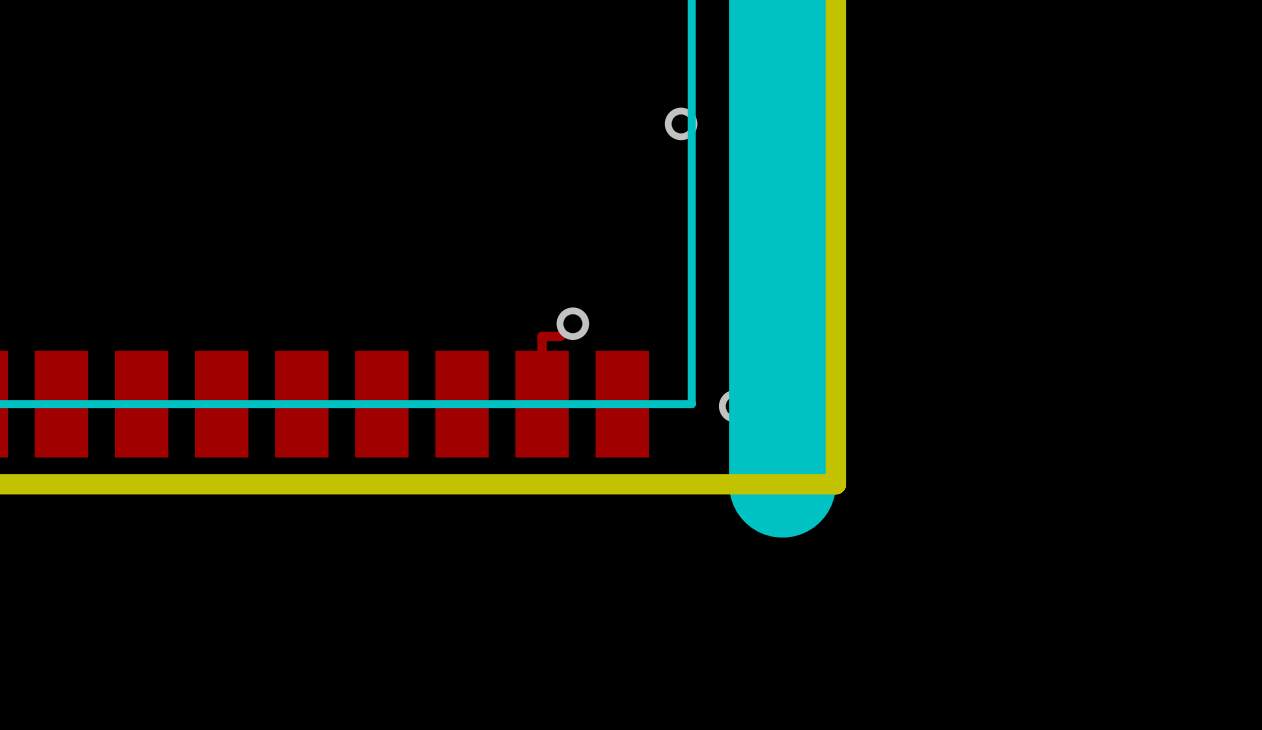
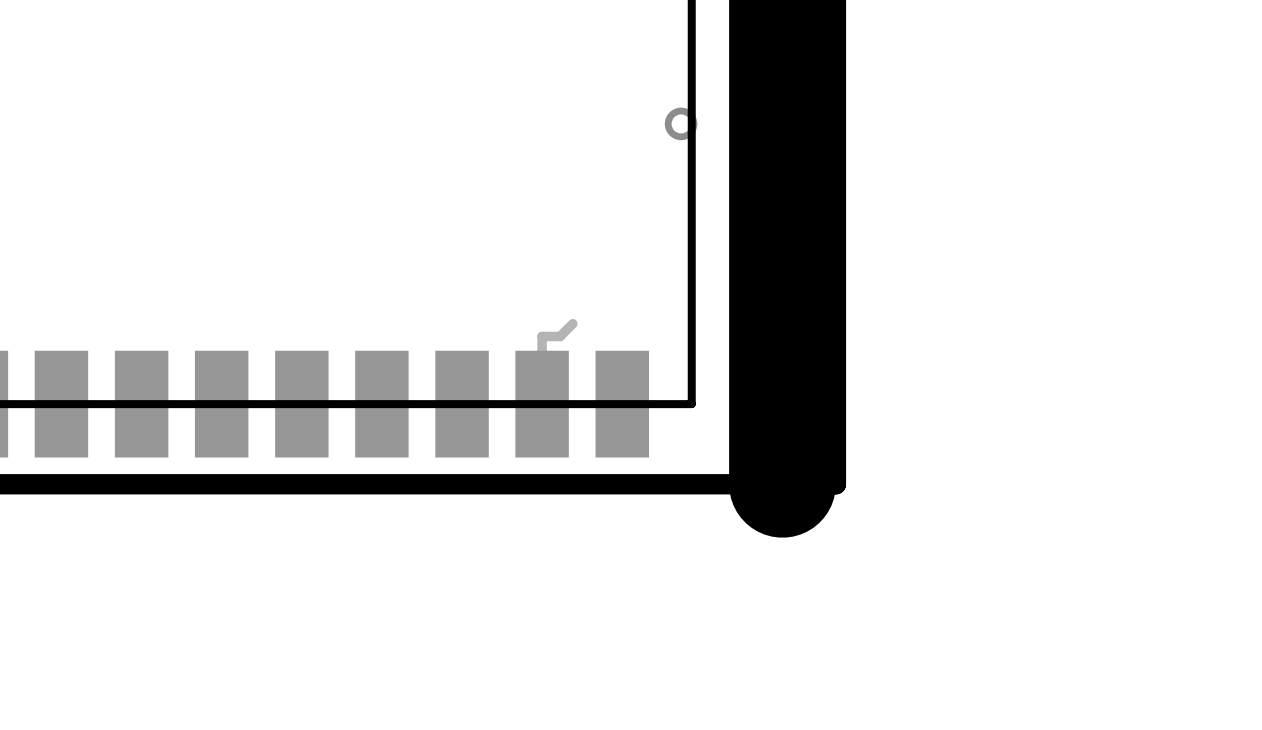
via: (572, 323) -> none
via: (735, 406) -> none

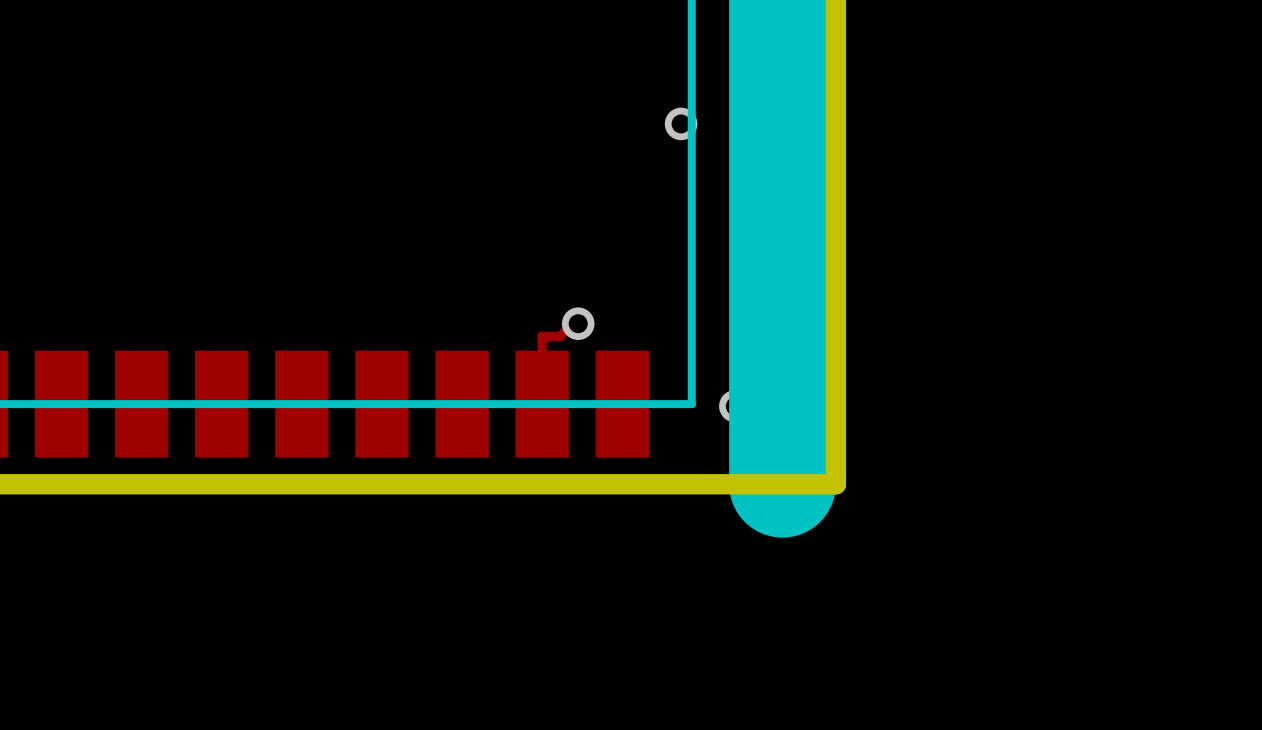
via: none -> (578, 323)
via: none -> (735, 406)

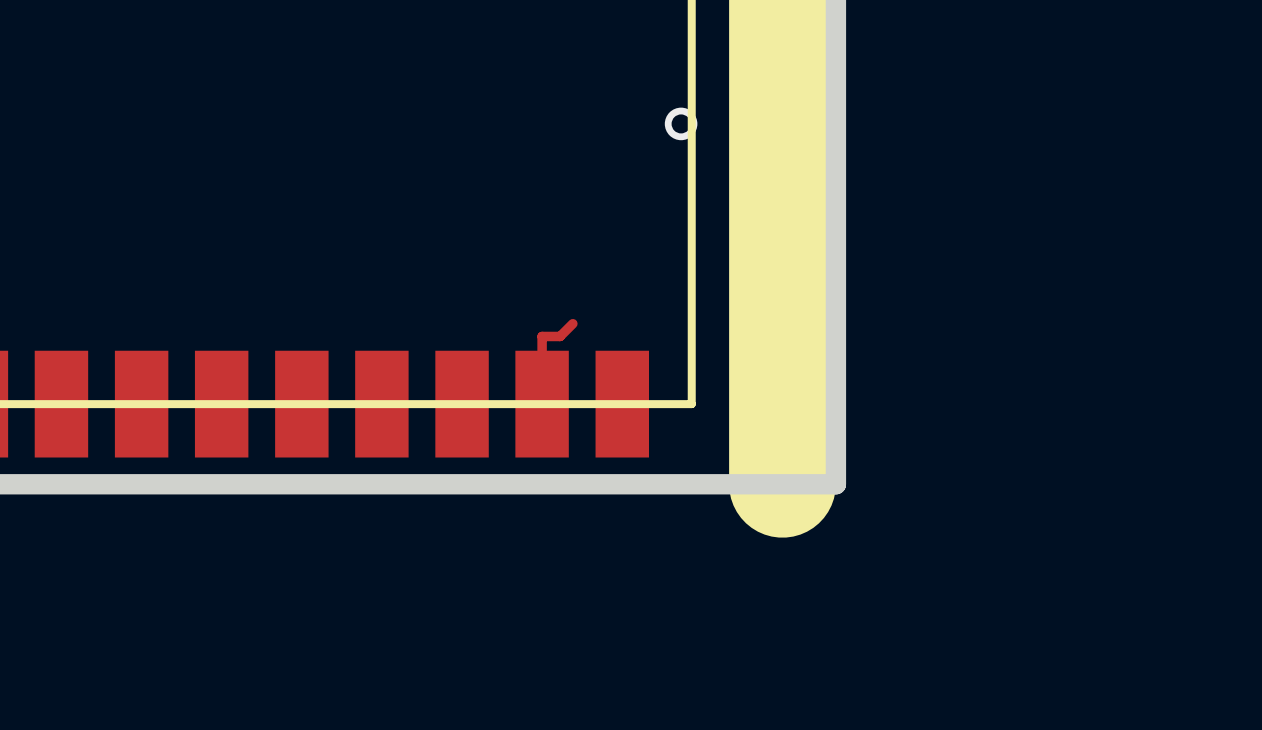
via: (578, 323) -> none
via: (735, 406) -> none

